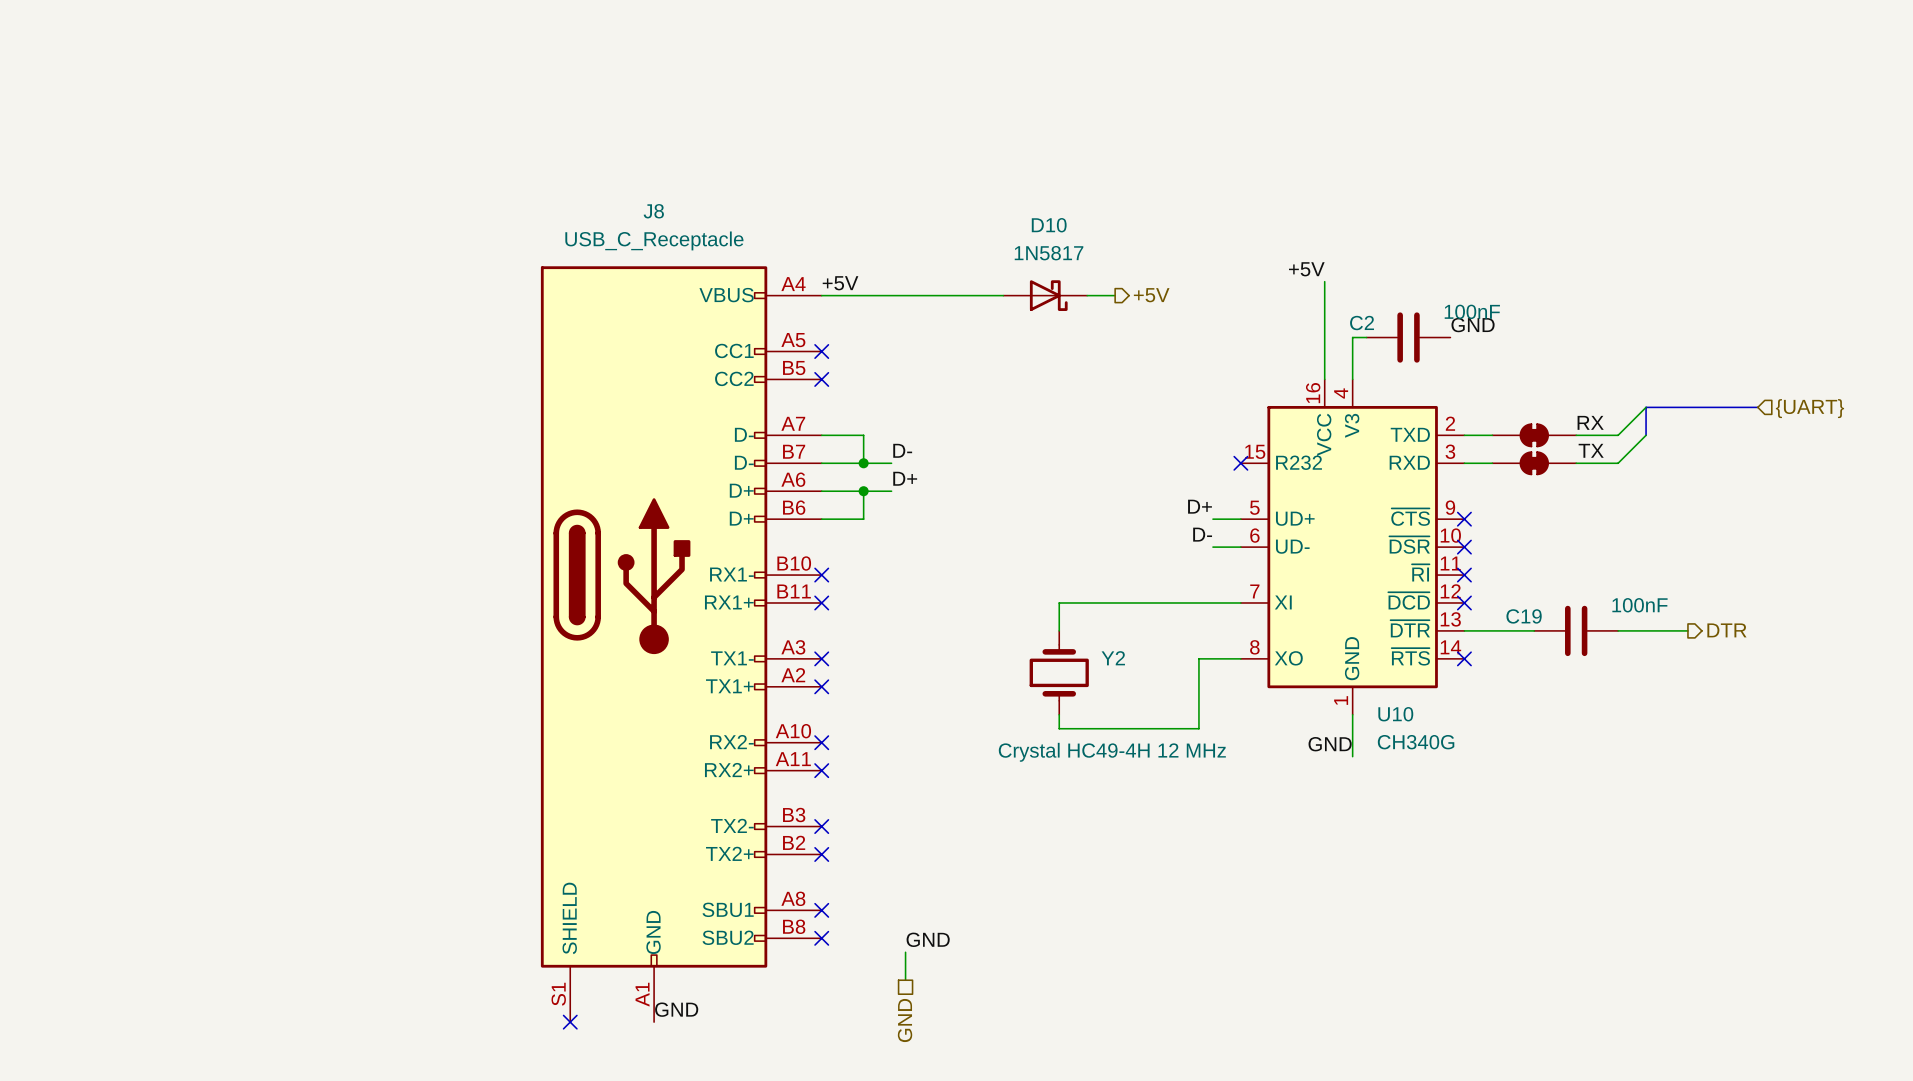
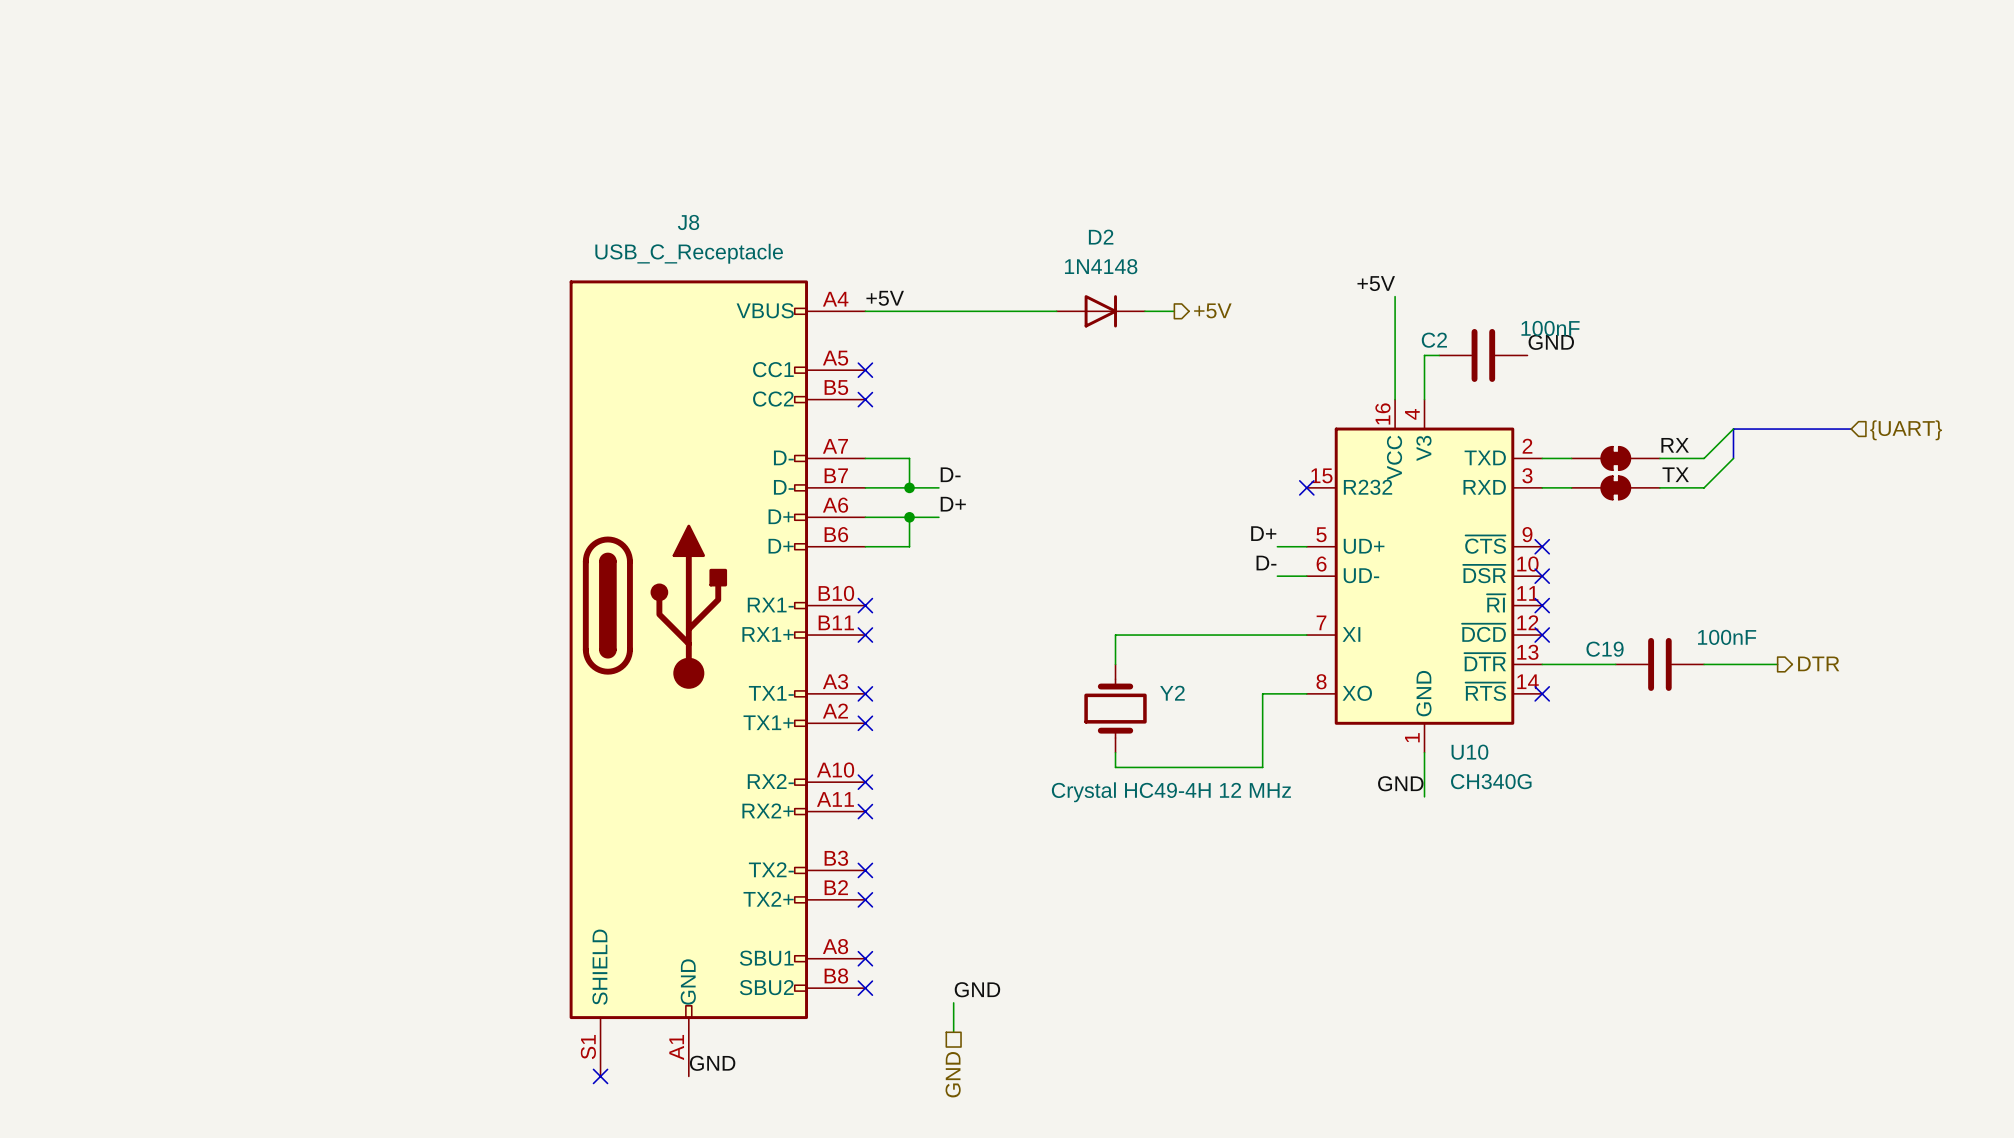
D10: 1N5817 (1045, 295) -> none
D2: none -> 1N4148 (1100, 311)

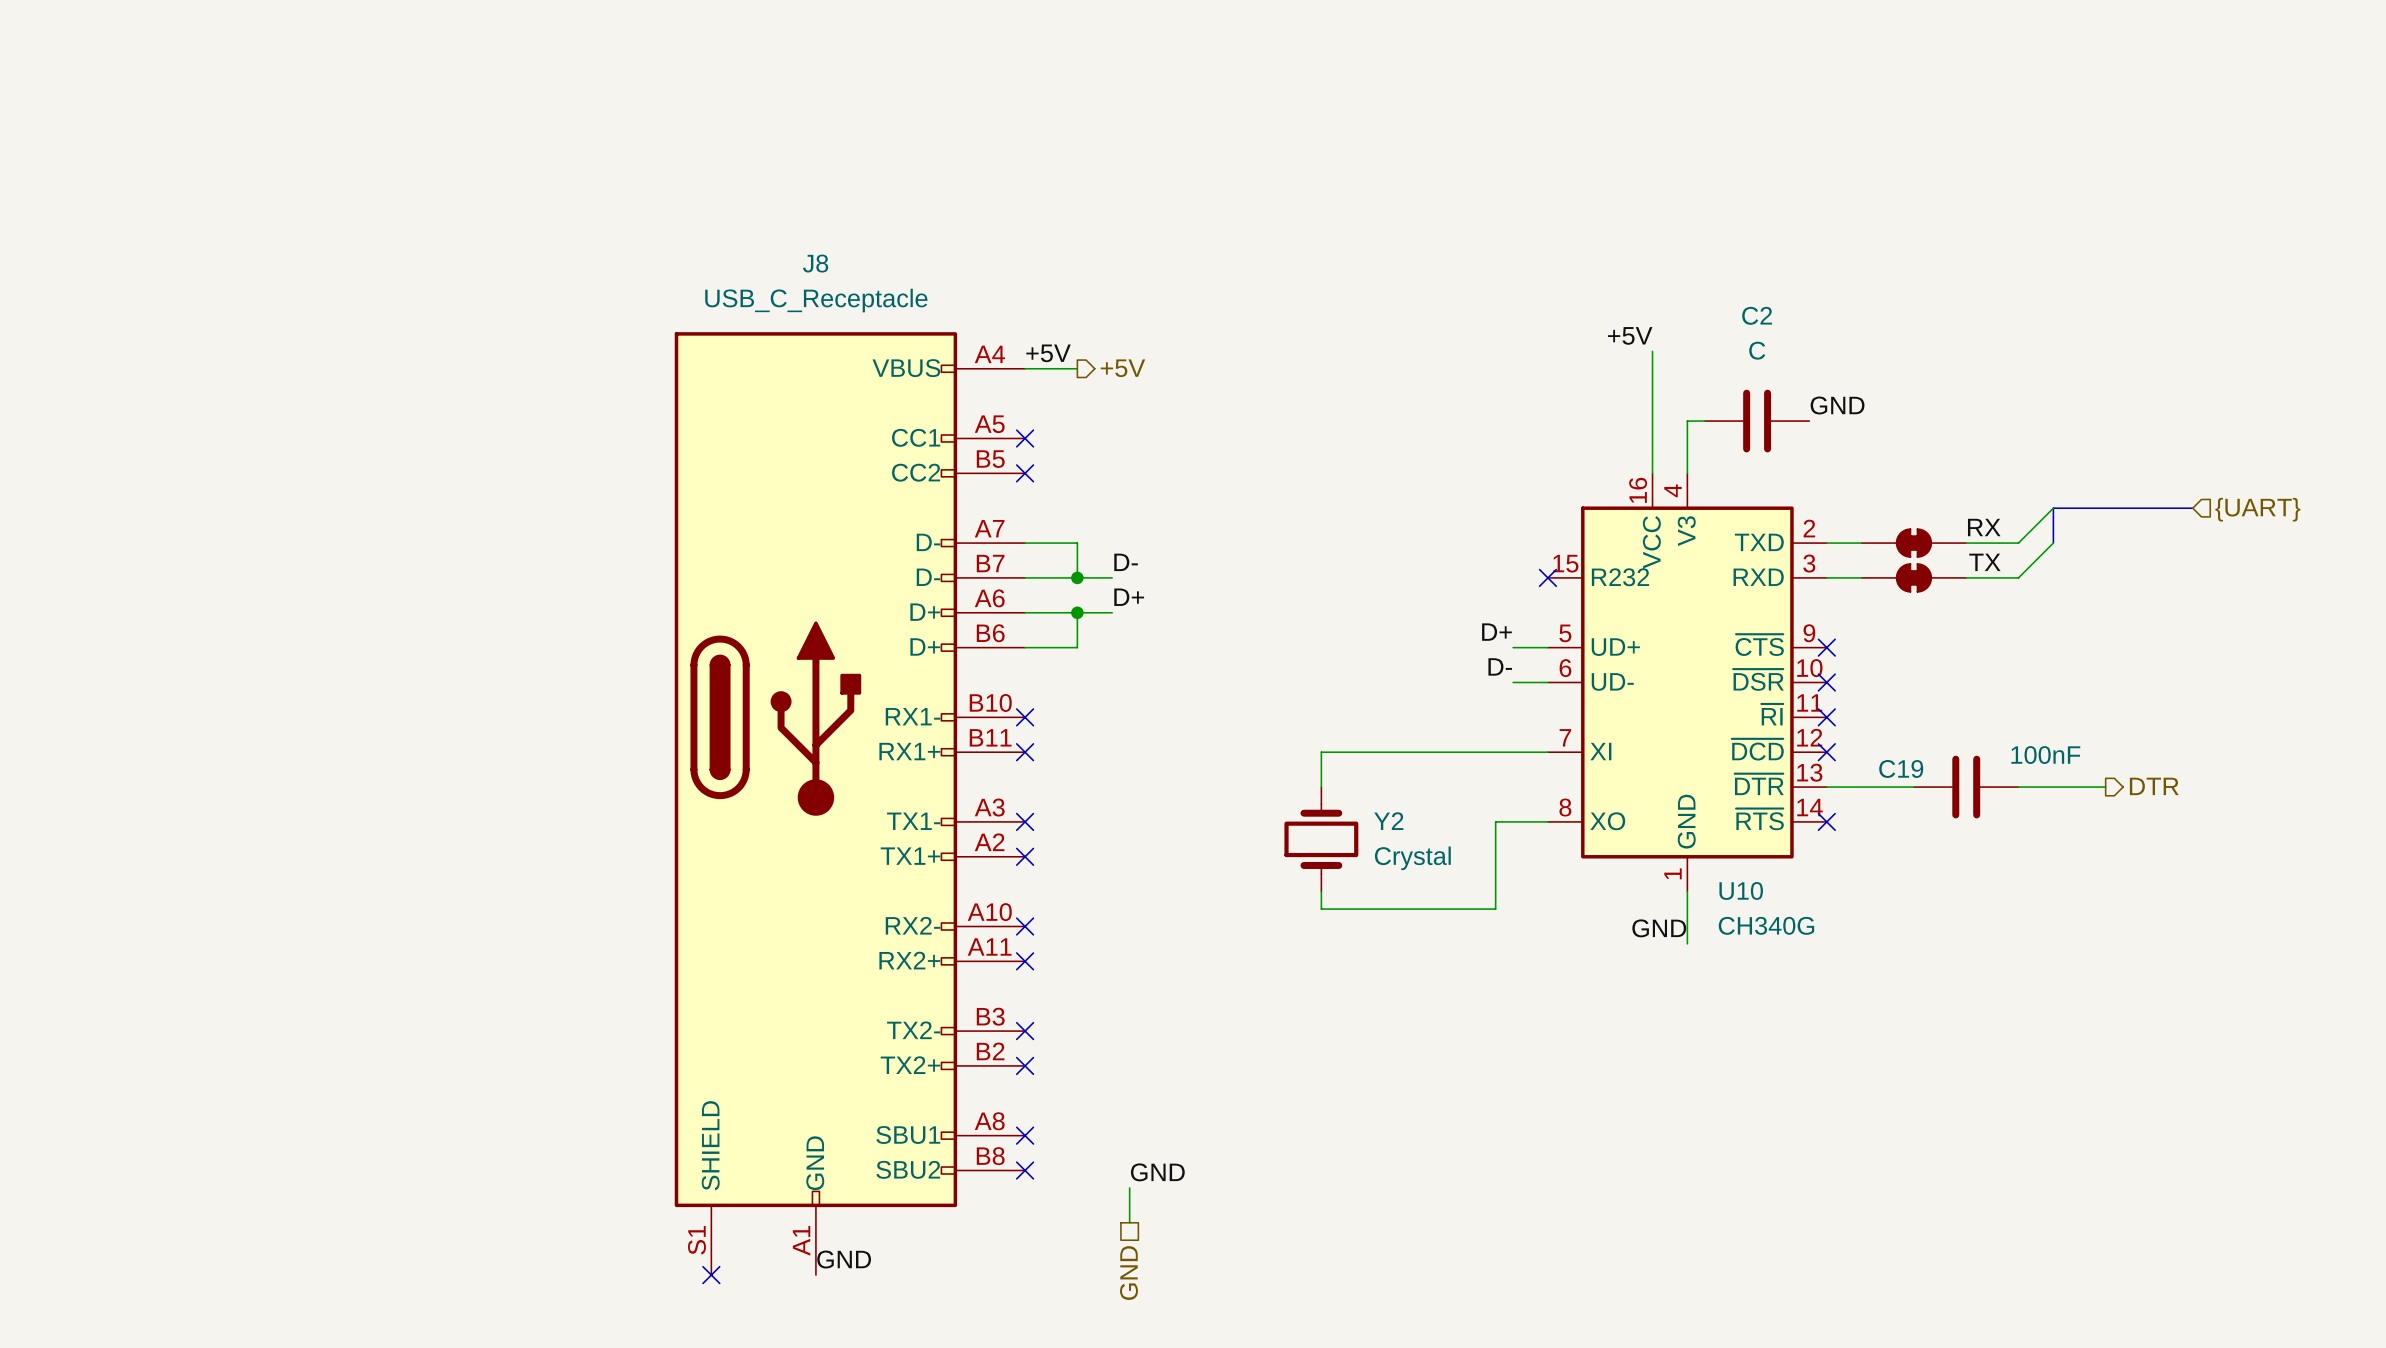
hierarchical label position: +5V (1212, 310) -> +5V (1122, 368)
wire: (909, 311) (1056, 311) -> none
D2: 1N4148 (1100, 311) -> none
wire: (1144, 311) (1174, 311) -> none
C2 value: 100nF (1550, 328) -> C (1757, 350)
C2 name position: C2 (1434, 340) -> C2 (1757, 315)
Y2 value: Crystal HC49-4H 12 MHz (1171, 792) -> Crystal (1412, 858)

